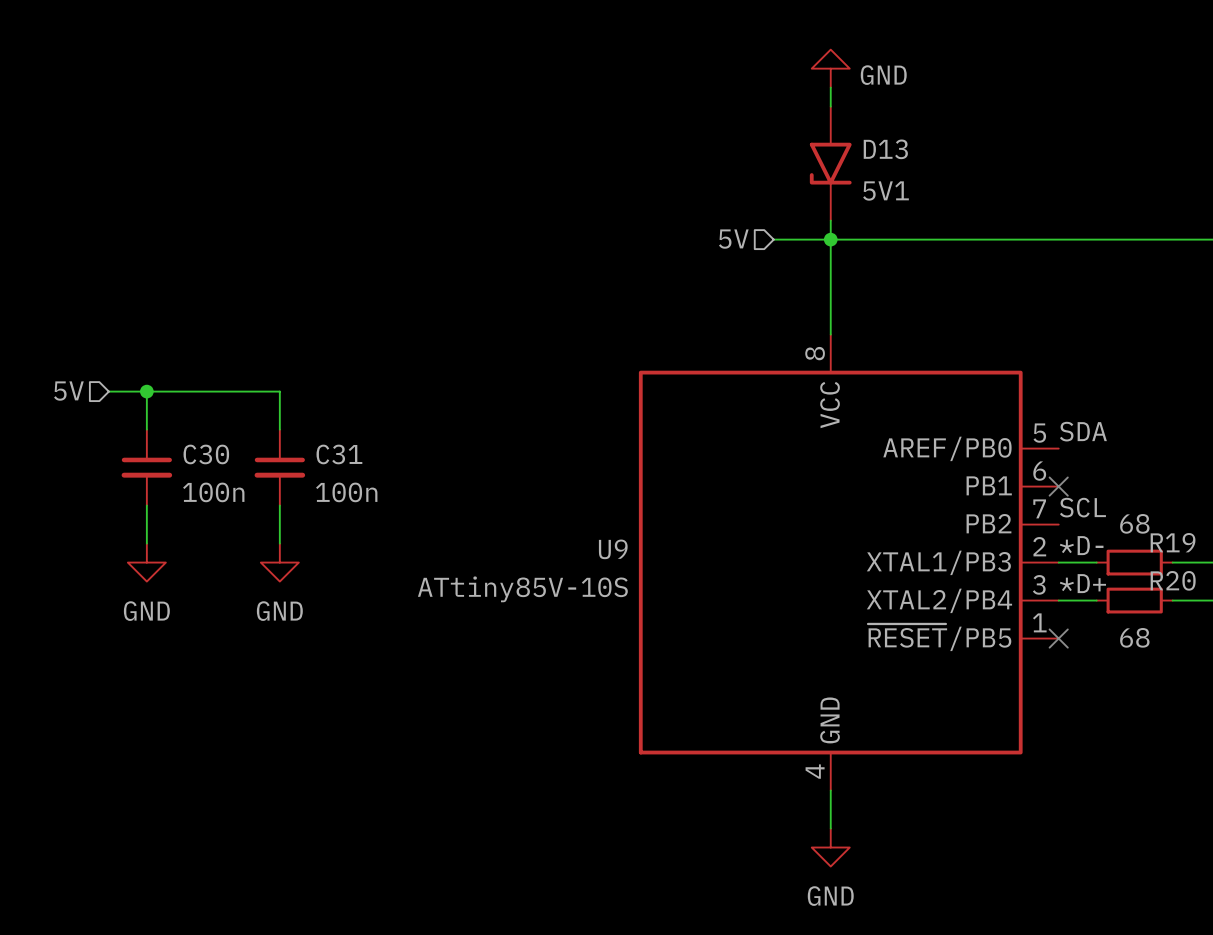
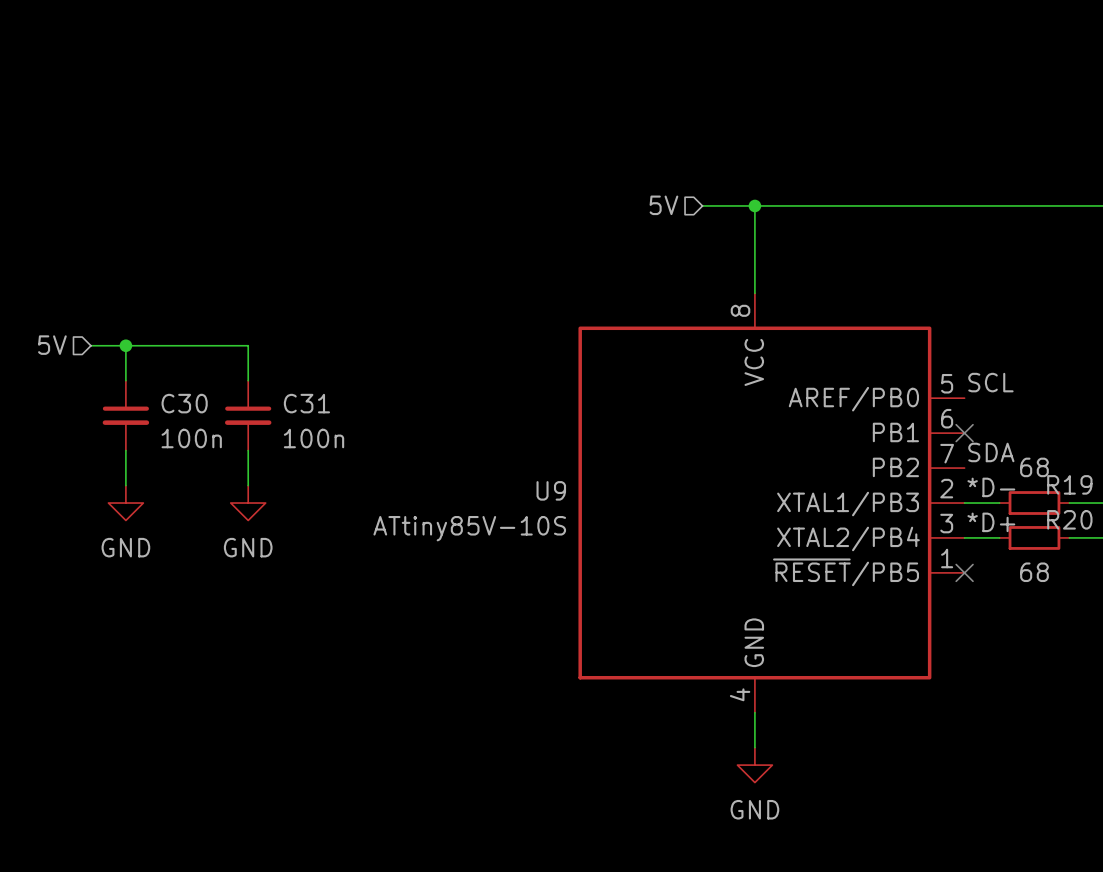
power symbol: GND (830, 68) -> none
wire: (830, 87) (830, 106) -> none
D13: 5V1 (830, 163) -> none
wire: (830, 220) (830, 239) -> none
label: SDA (1083, 431) -> SCL (990, 382)
label: SCL (1082, 507) -> SDA (991, 452)

